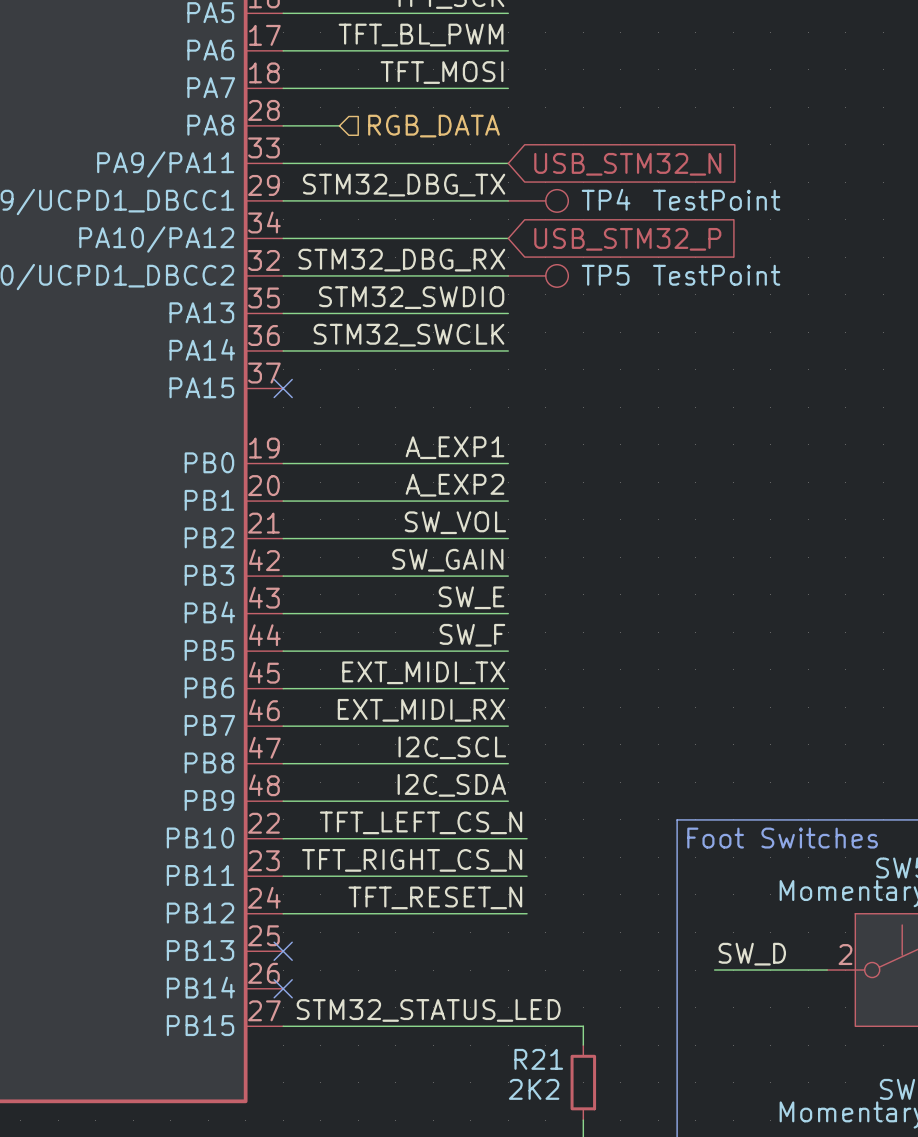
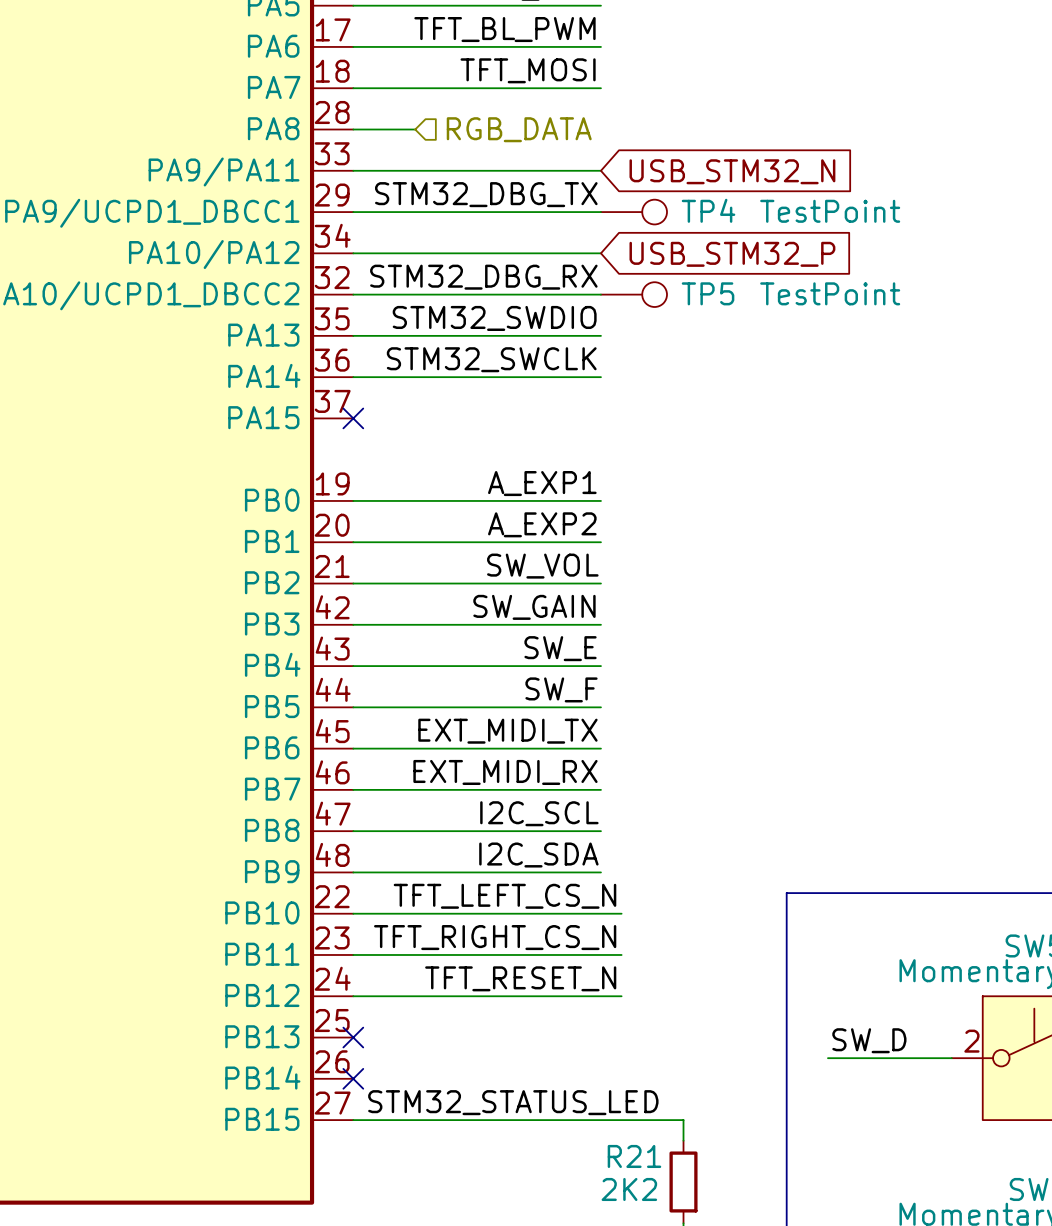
text: Foot Switches (782, 838) -> none

